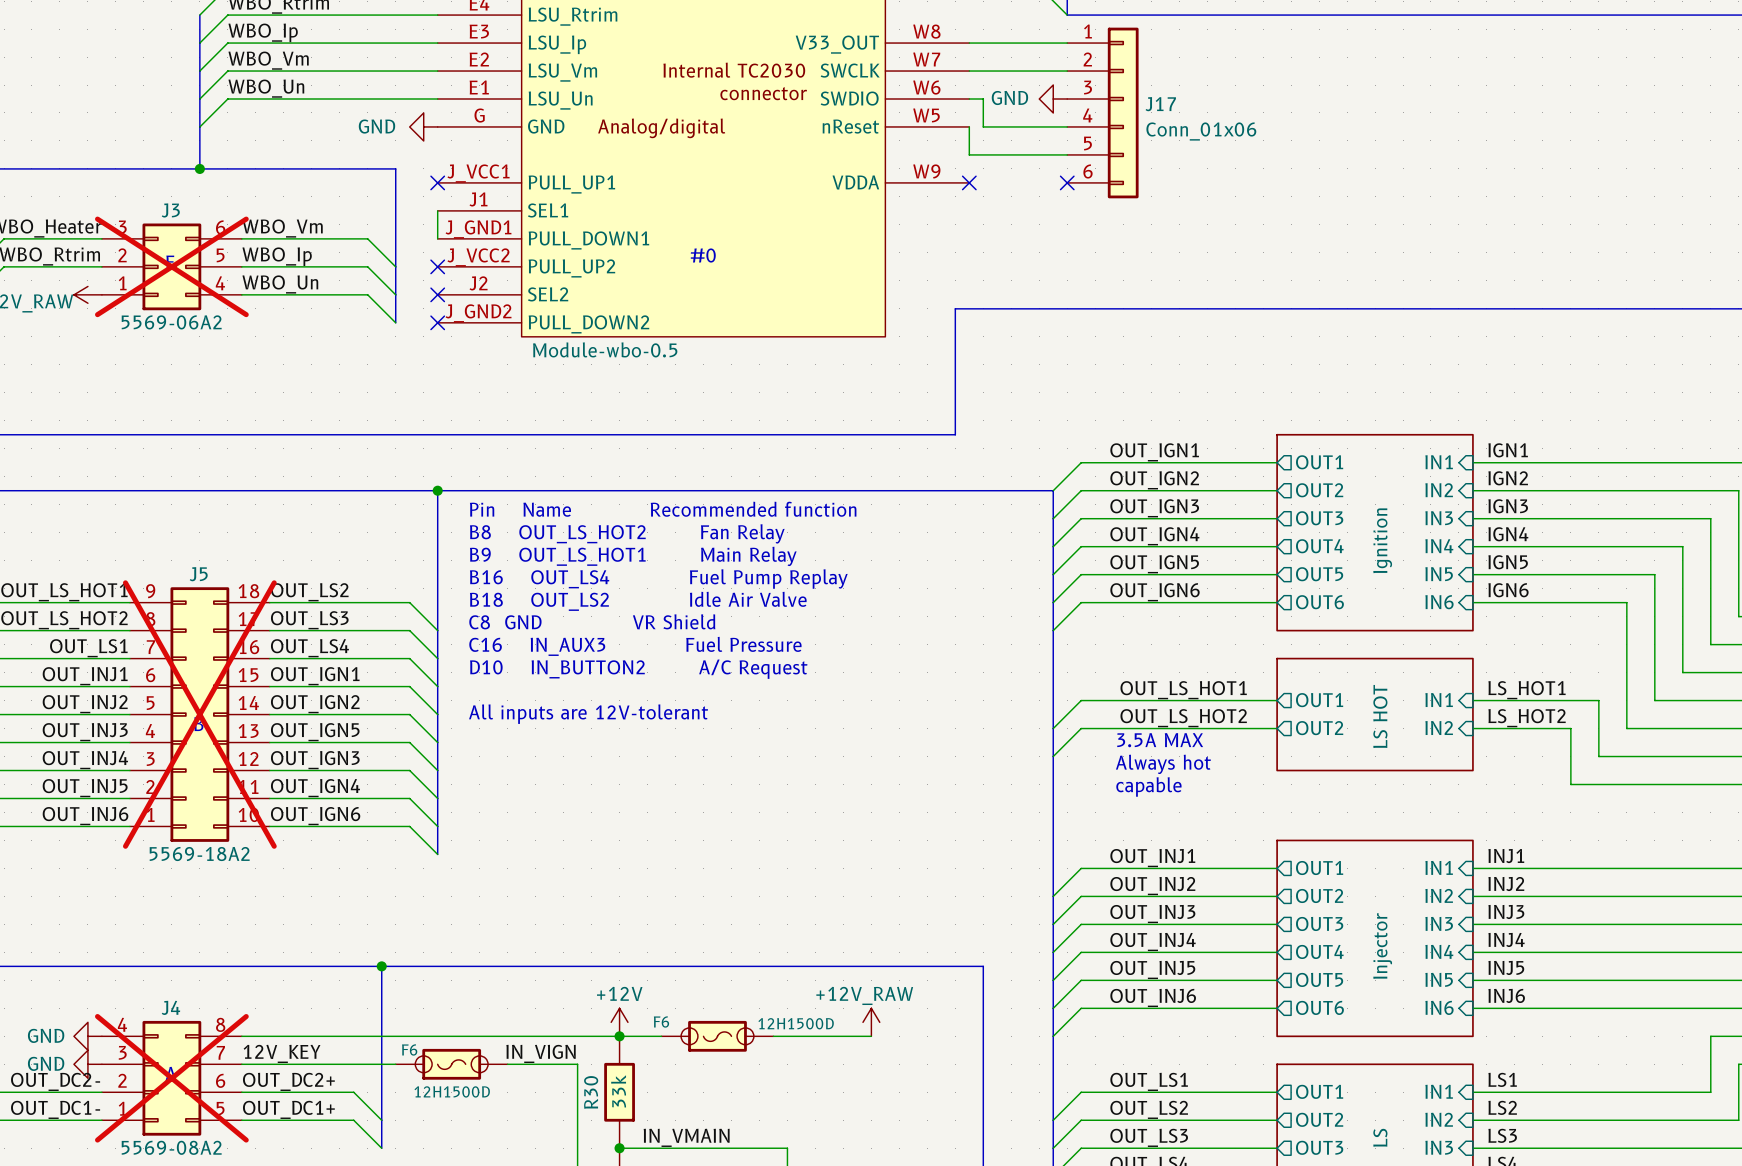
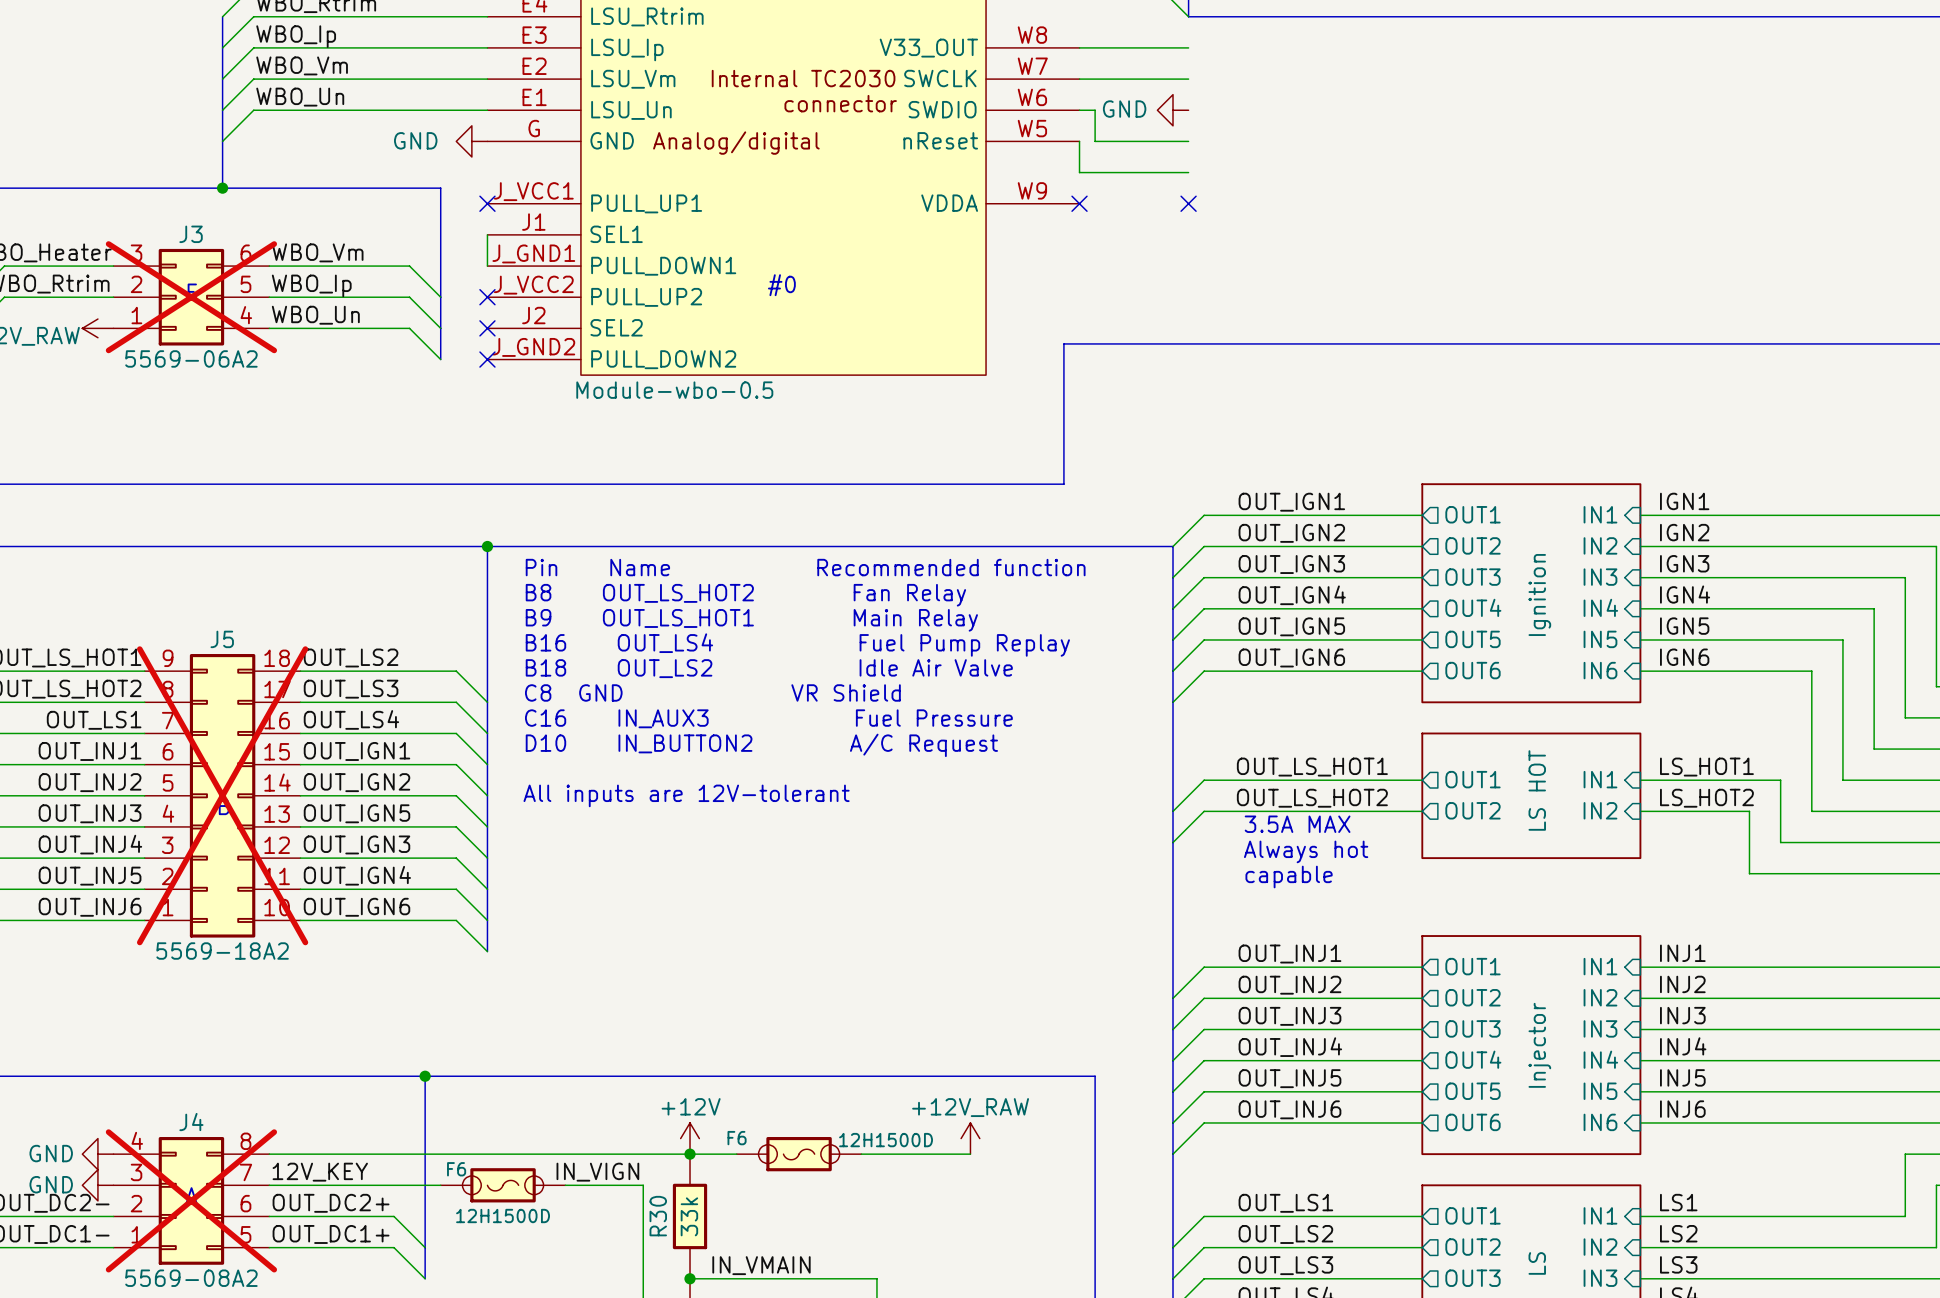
J17: Conn_01x06 (1102, 112) -> none

